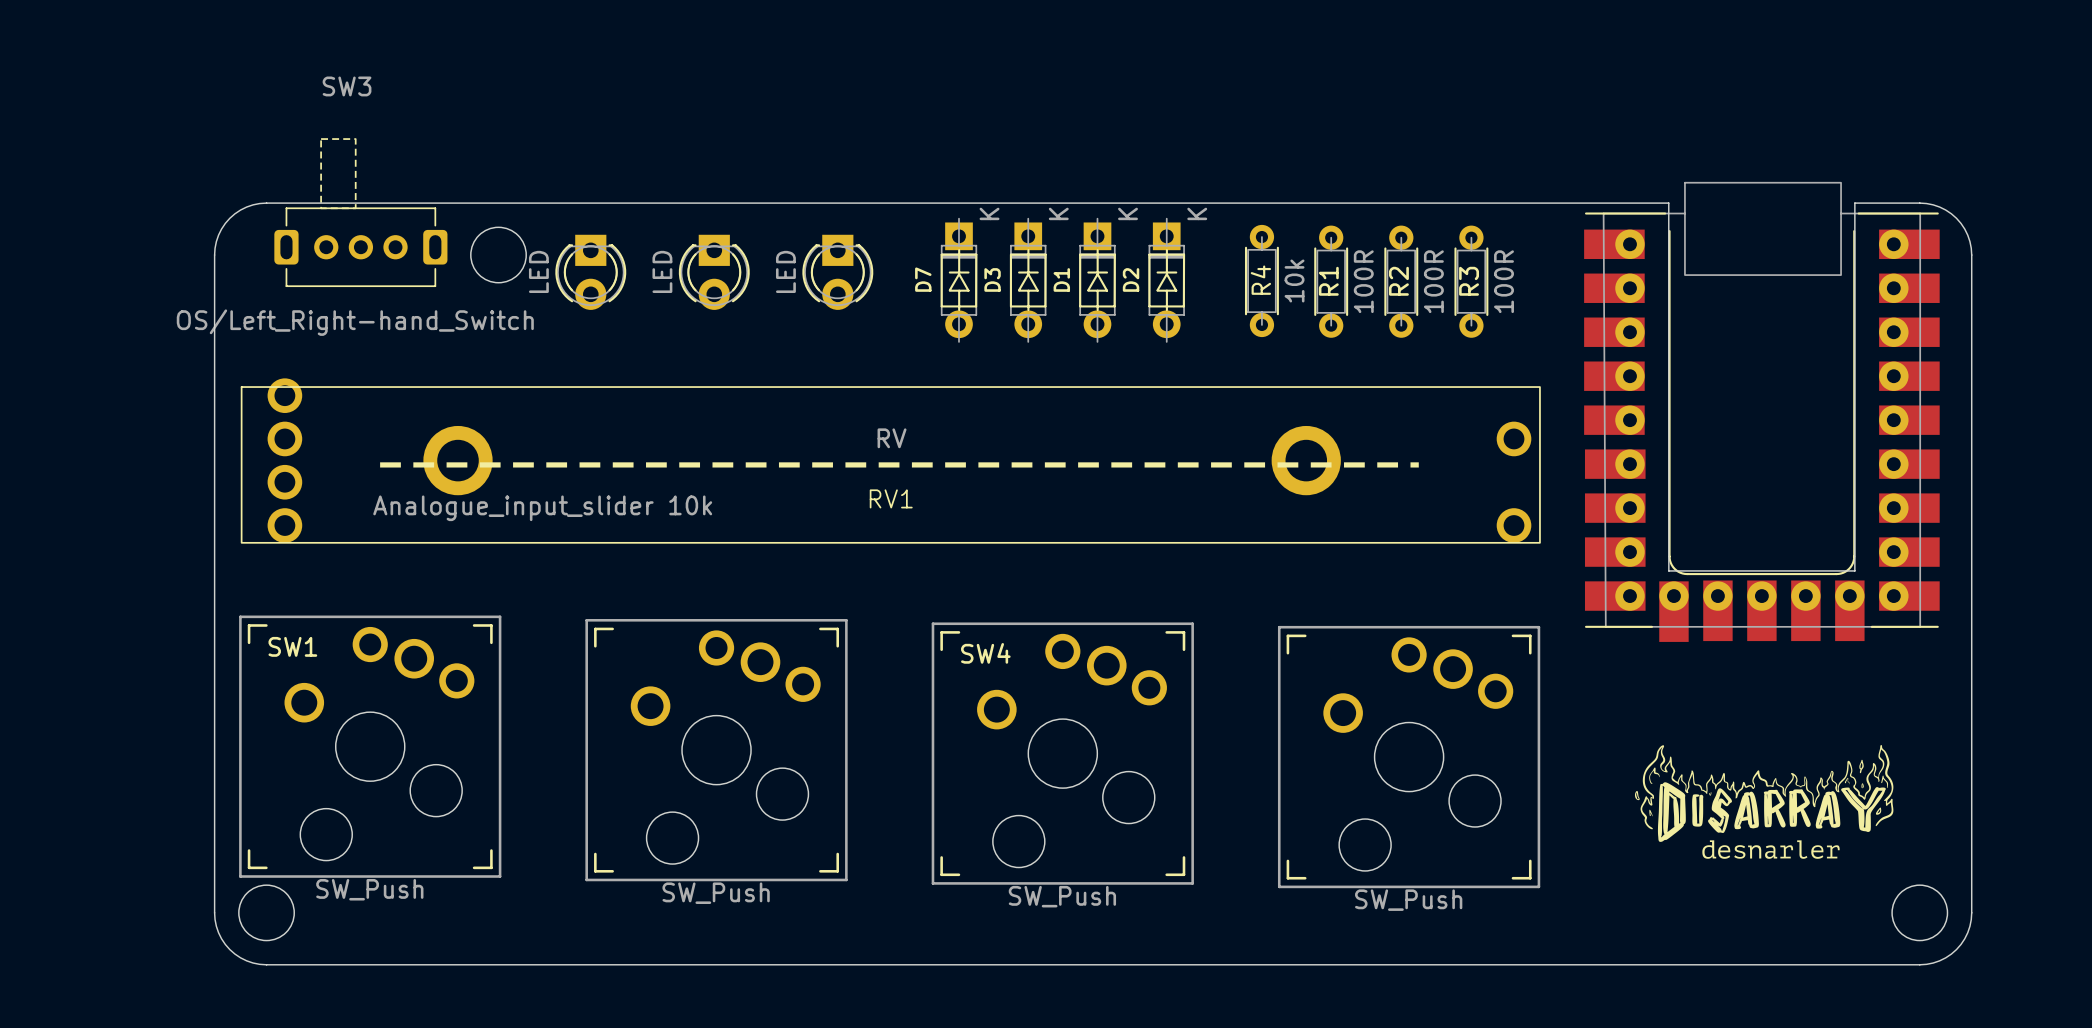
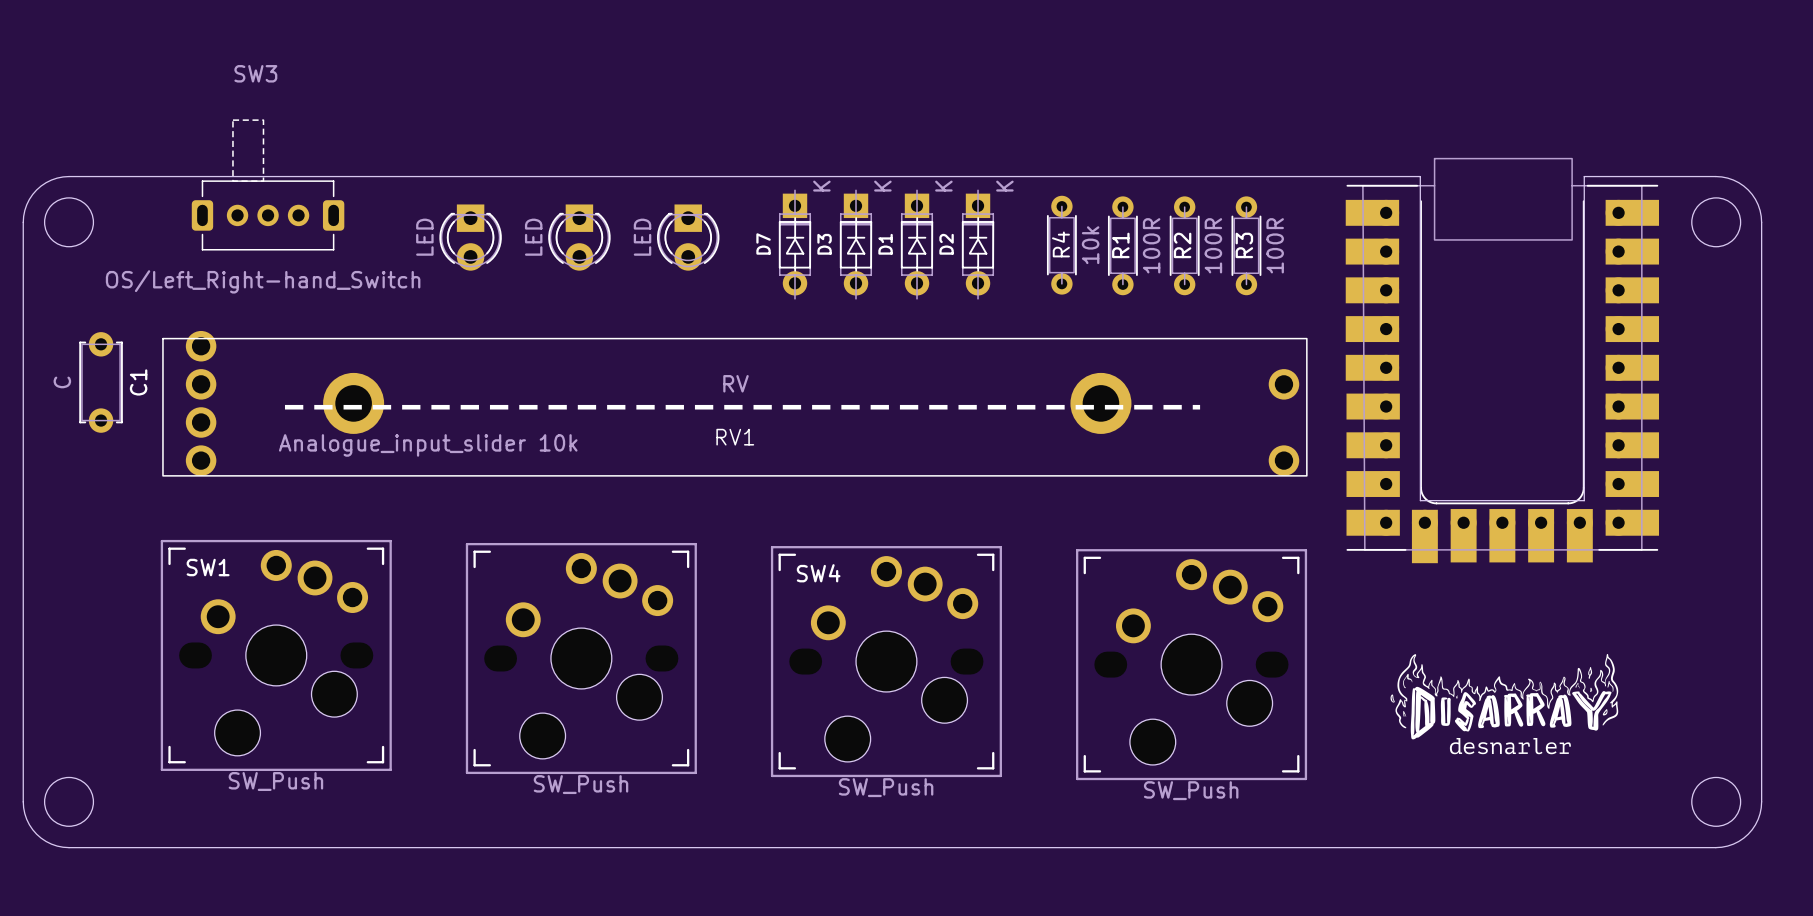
board edge: (266, 203) (246, 207) (229, 218) (218, 235) (214, 255) (215, 919) (221, 938) (234, 954) (253, 963) (266, 964) -> (184, 176) (57, 178) (46, 182) (32, 194) (24, 210) (23, 222) (23, 801) (24, 813) (29, 824) (36, 834) (46, 841) (57, 846) (184, 847)
board edge: (1919, 203) (1939, 207) (1956, 218) (1967, 235) (1971, 255) (1971, 919) (1964, 938) (1951, 954) (1933, 963) (1919, 964) -> (1641, 176) (1715, 176) (1733, 180) (1743, 186) (1755, 199) (1760, 210) (1761, 222) (1761, 807) (1758, 819) (1752, 829) (1743, 838) (1727, 846) (1641, 847)
round board edge: none -> [44, 197, 94, 248]
round board edge: [470, 227, 527, 284] -> none
round board edge: none -> [1691, 197, 1741, 248]
C1: none -> C (101, 382)
round board edge position: (266, 912) -> (69, 801)
round board edge position: (1919, 912) -> (1716, 801)

